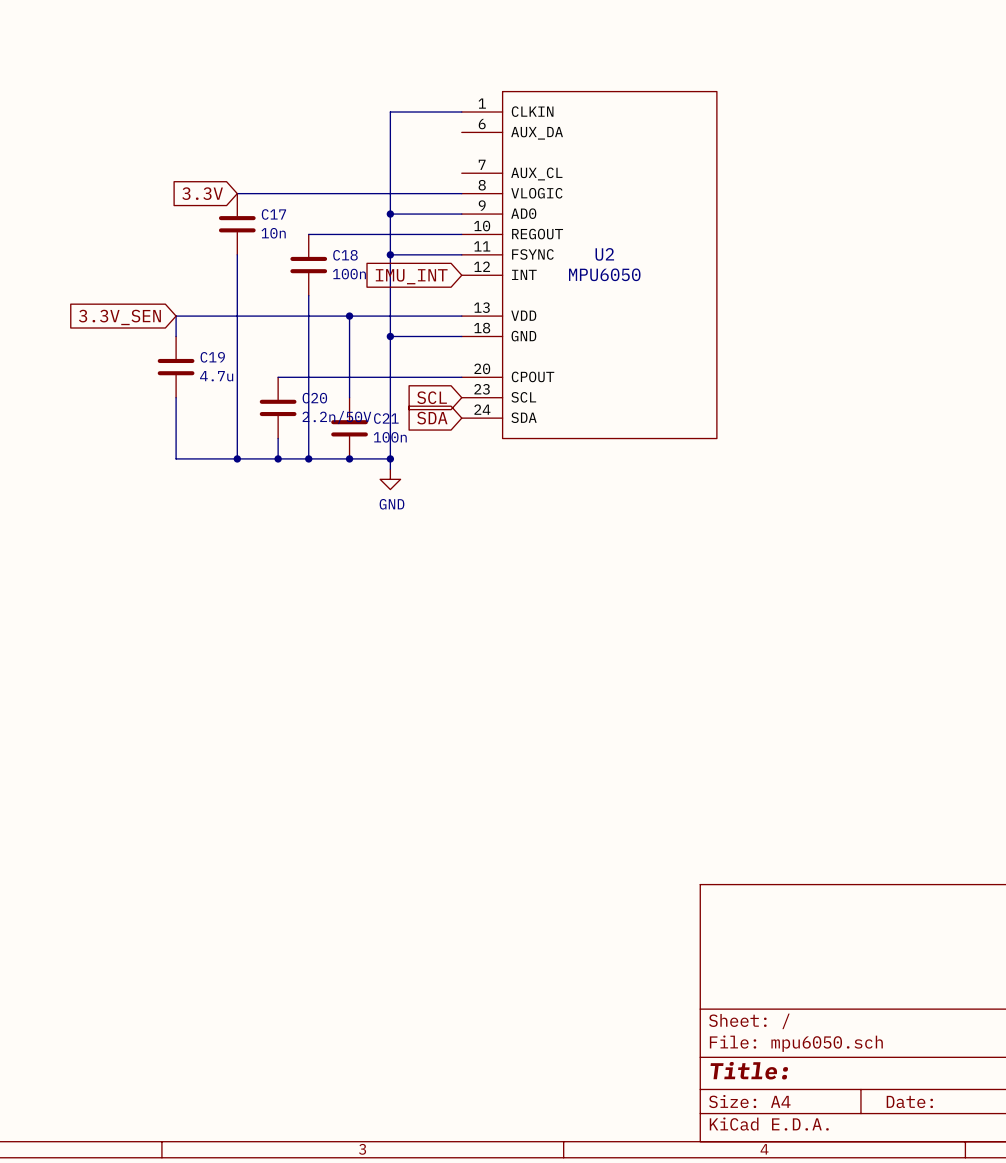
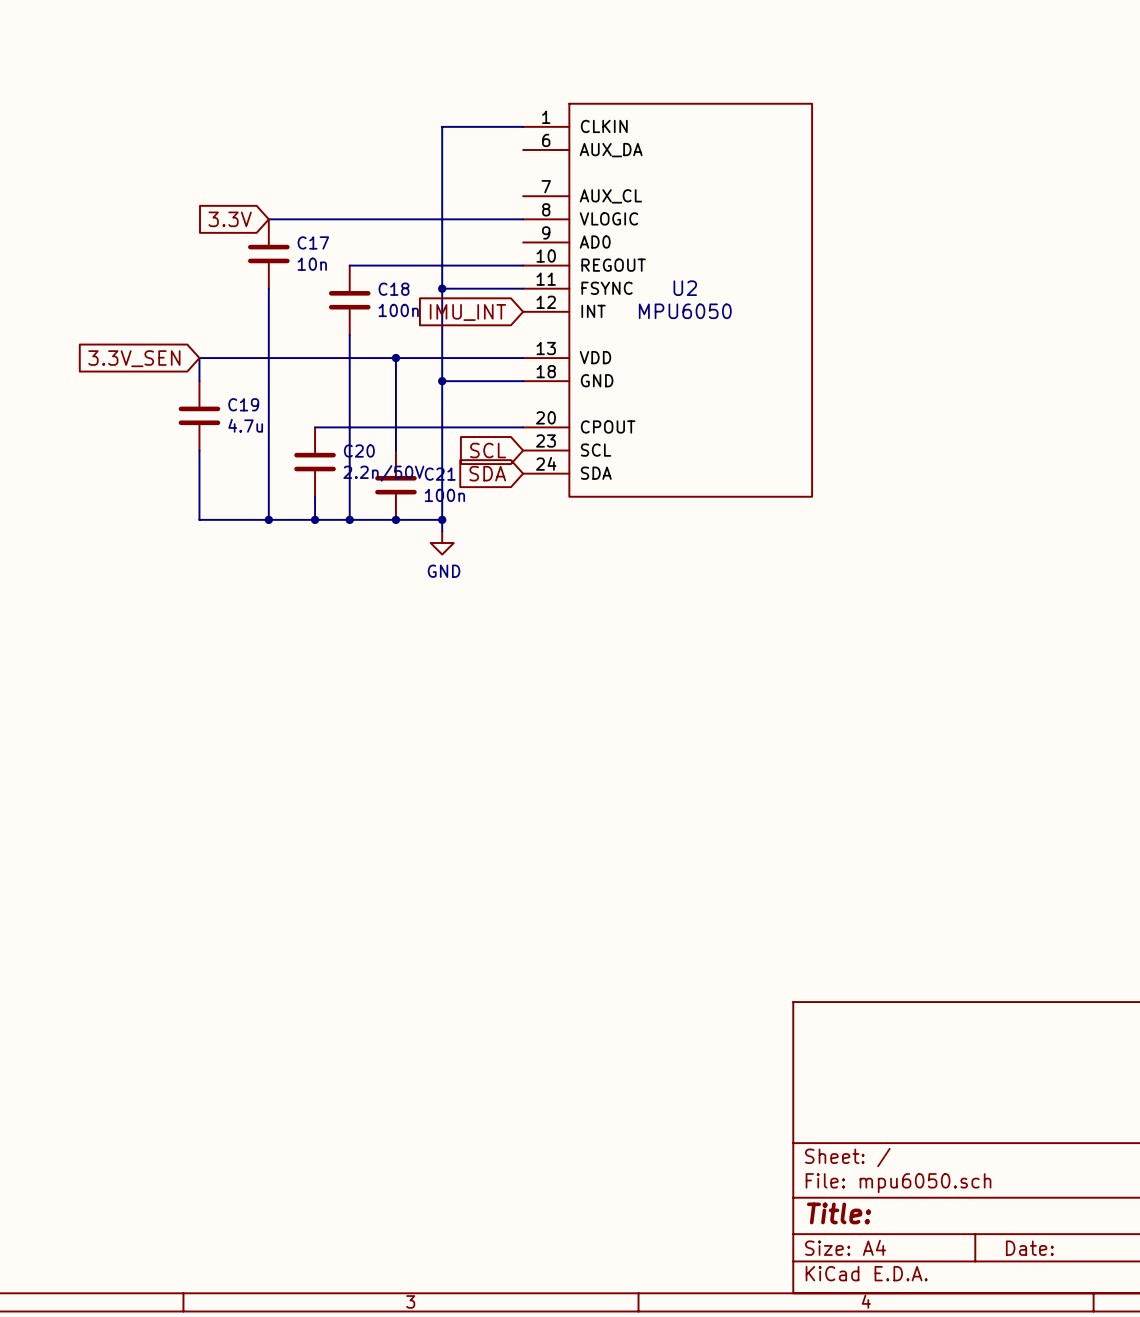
wire: (390, 214) (461, 214) -> none
junction: (390, 214) -> none

